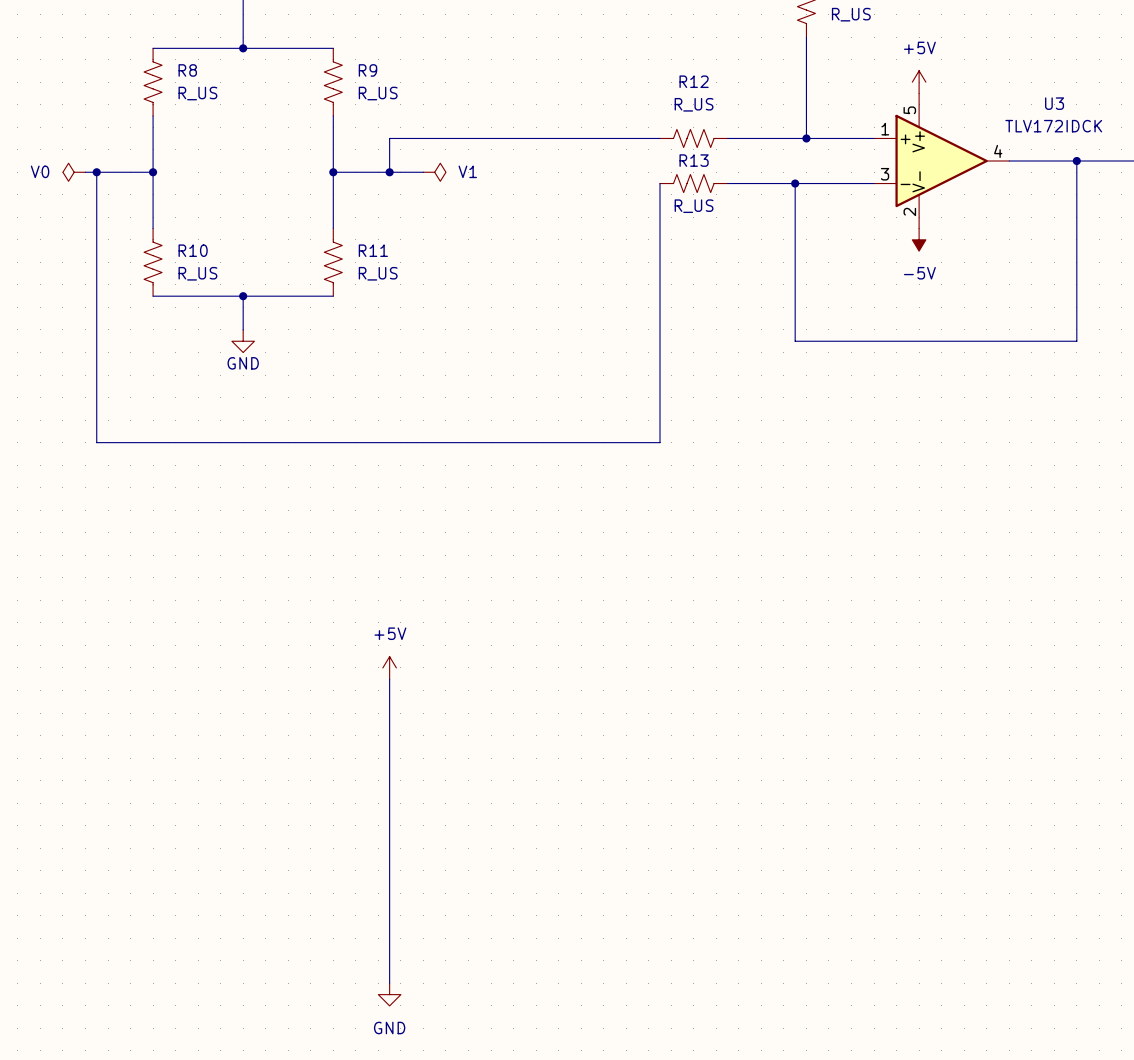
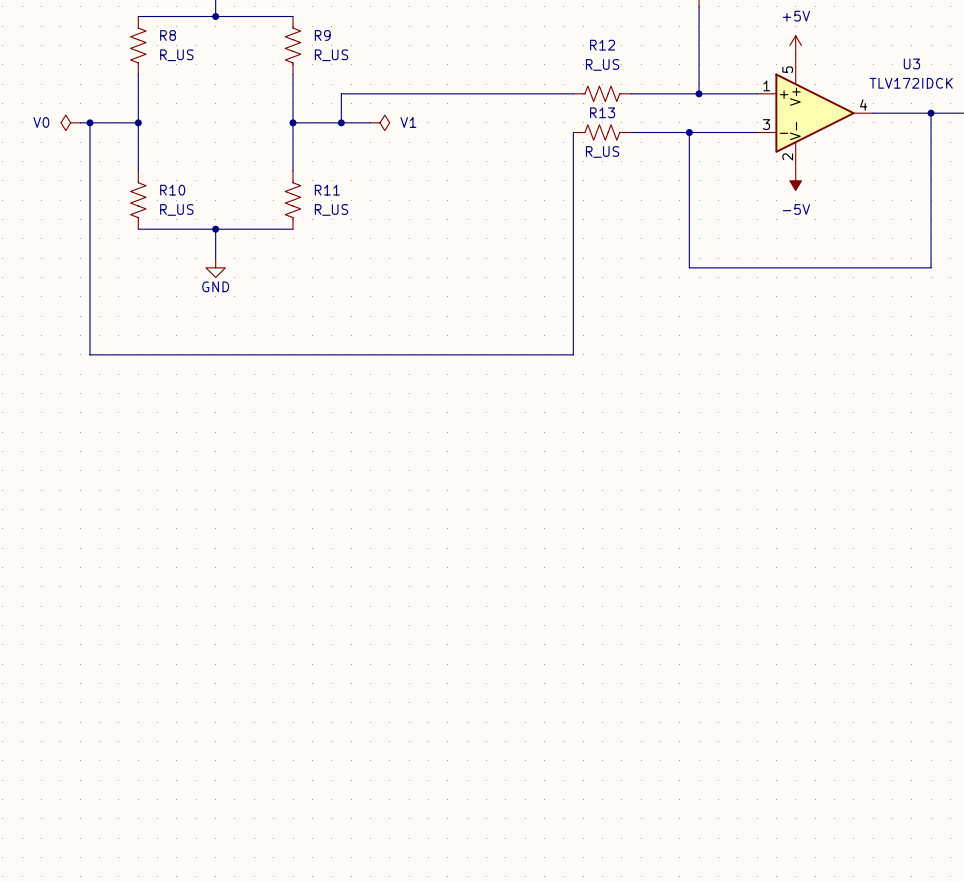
power symbol: +5V (389, 667) -> none
wire: (389, 679) (389, 983) -> none
power symbol: GND (389, 994) -> none

